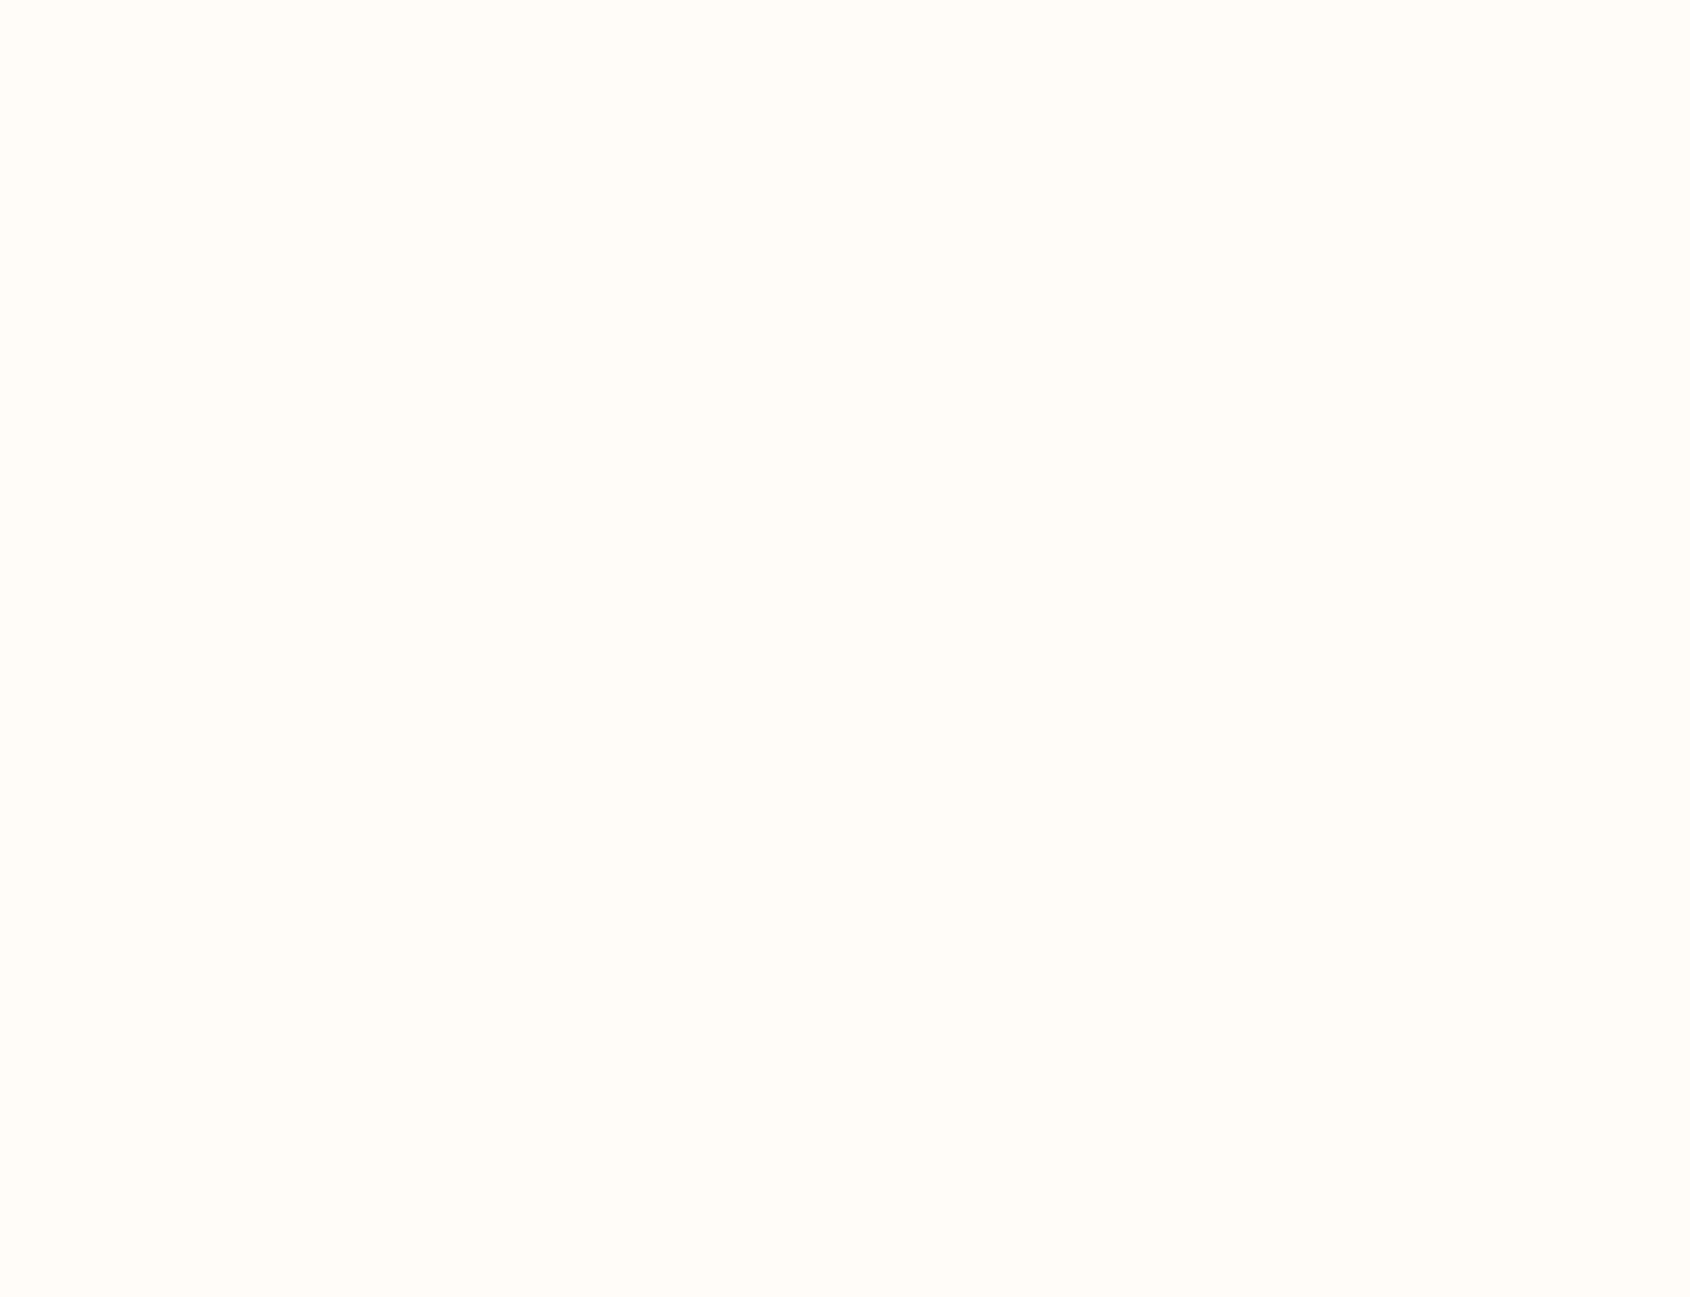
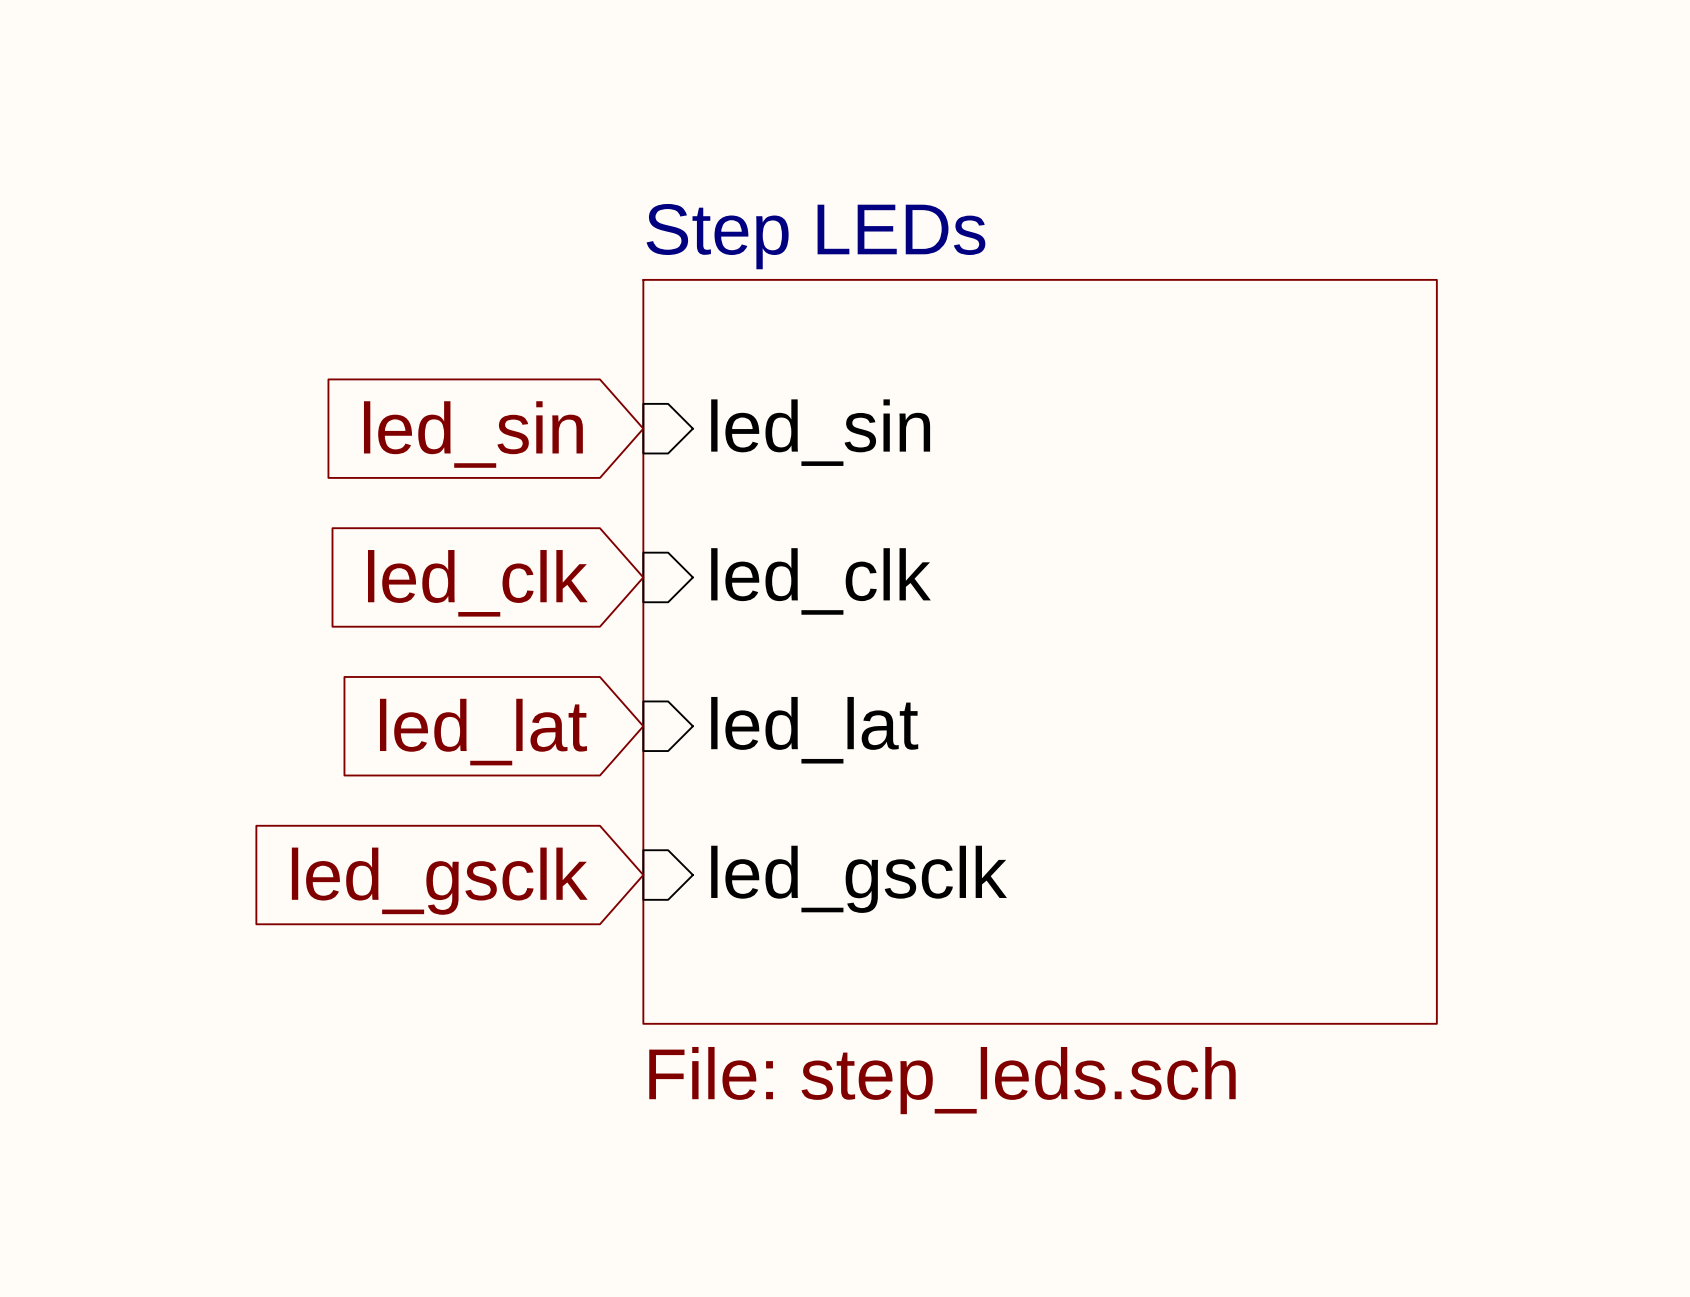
sheet pin: none -> led_sin (820, 432)
global label: none -> led_sin (473, 434)
sheet pin: none -> led_clk (821, 581)
global label: none -> led_clk (477, 583)
sheet Step LEDs: none -> File: step_leds.sch (1040, 651)
sheet pin: none -> led_lat (814, 730)
global label: none -> led_lat (483, 732)
sheet pin: none -> led_gsclk (859, 879)
global label: none -> led_gsclk (439, 881)

